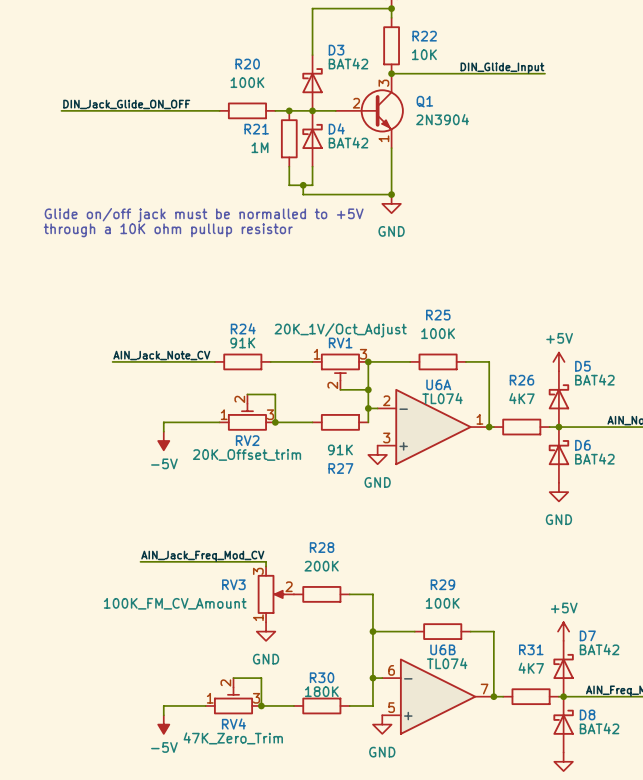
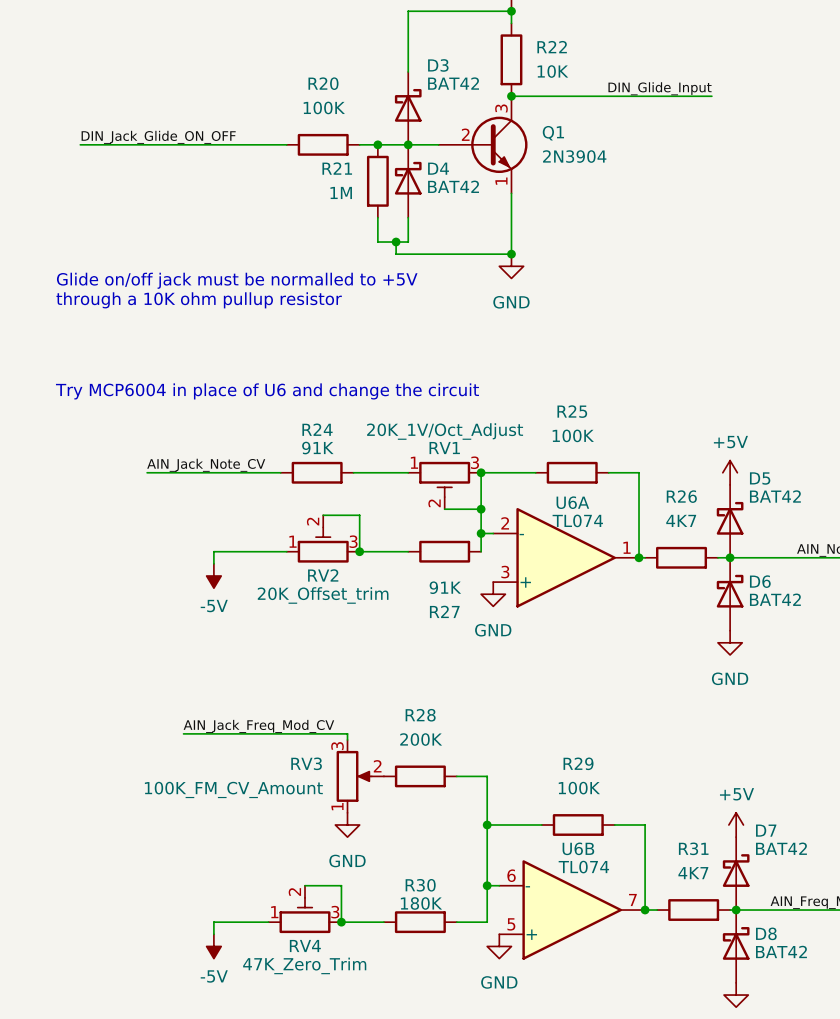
text: none -> Try MCP6004 in place of U6 and change the circuit (267, 391)

